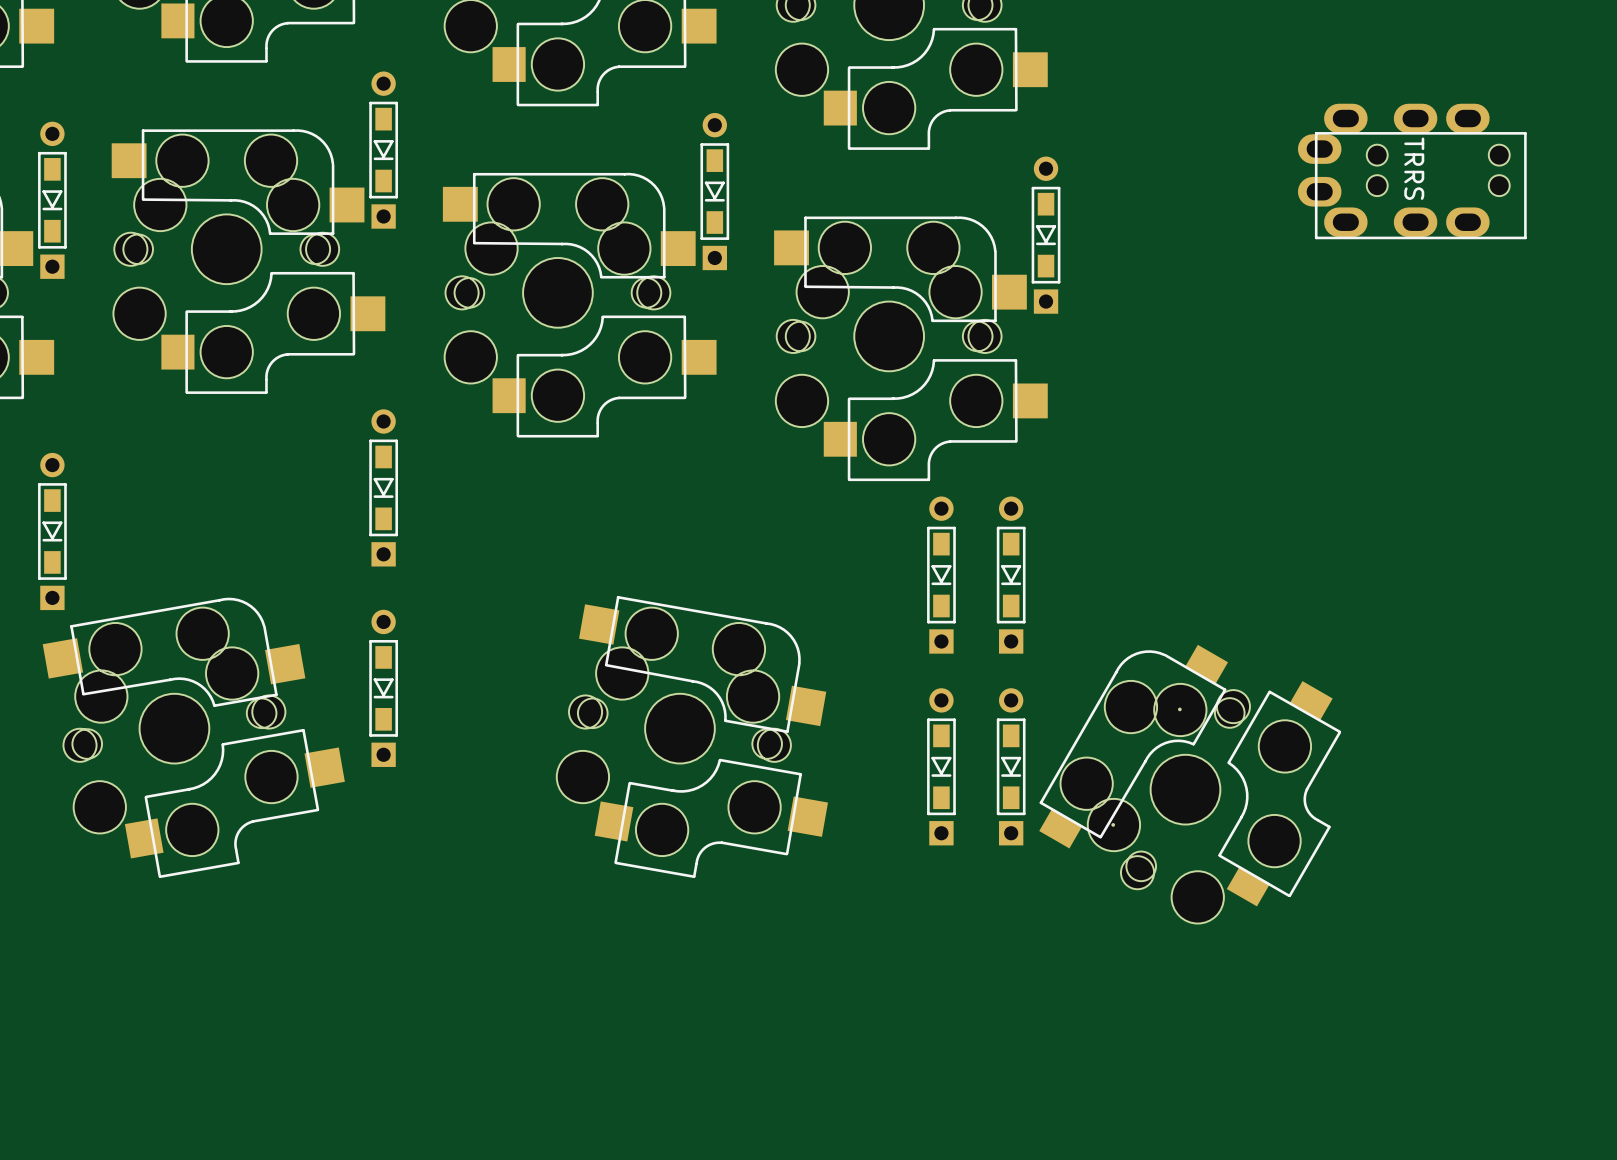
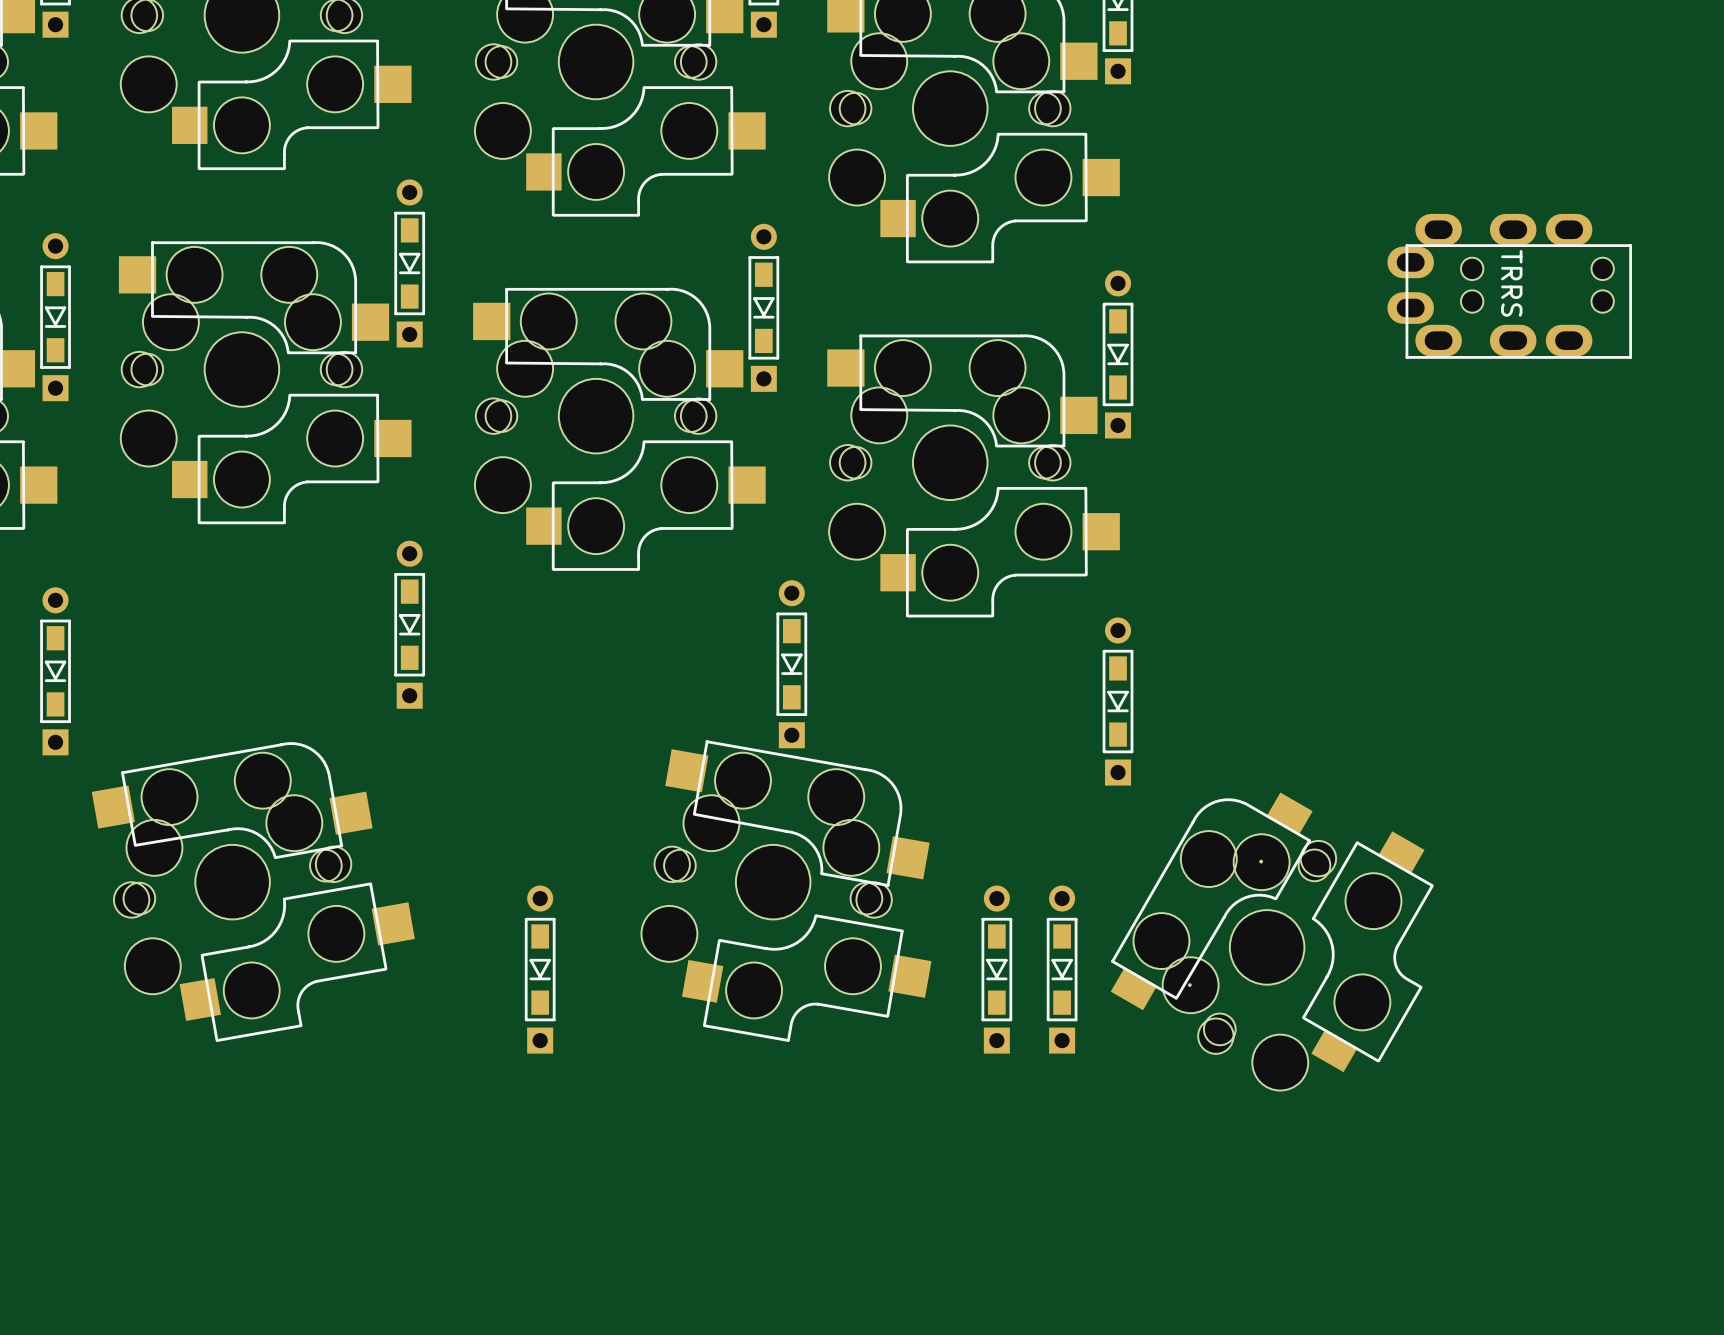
part: none -> (791, 664)
part: (941, 575) -> none
part position: (1011, 575) -> (1118, 701)
part position: (383, 688) -> (540, 969)
part position: (193, 737) -> (253, 892)
part position: (692, 737) -> (786, 891)
part: (941, 766) -> none
part: (1011, 766) -> none
part: none -> (996, 969)
part: none -> (1062, 969)

